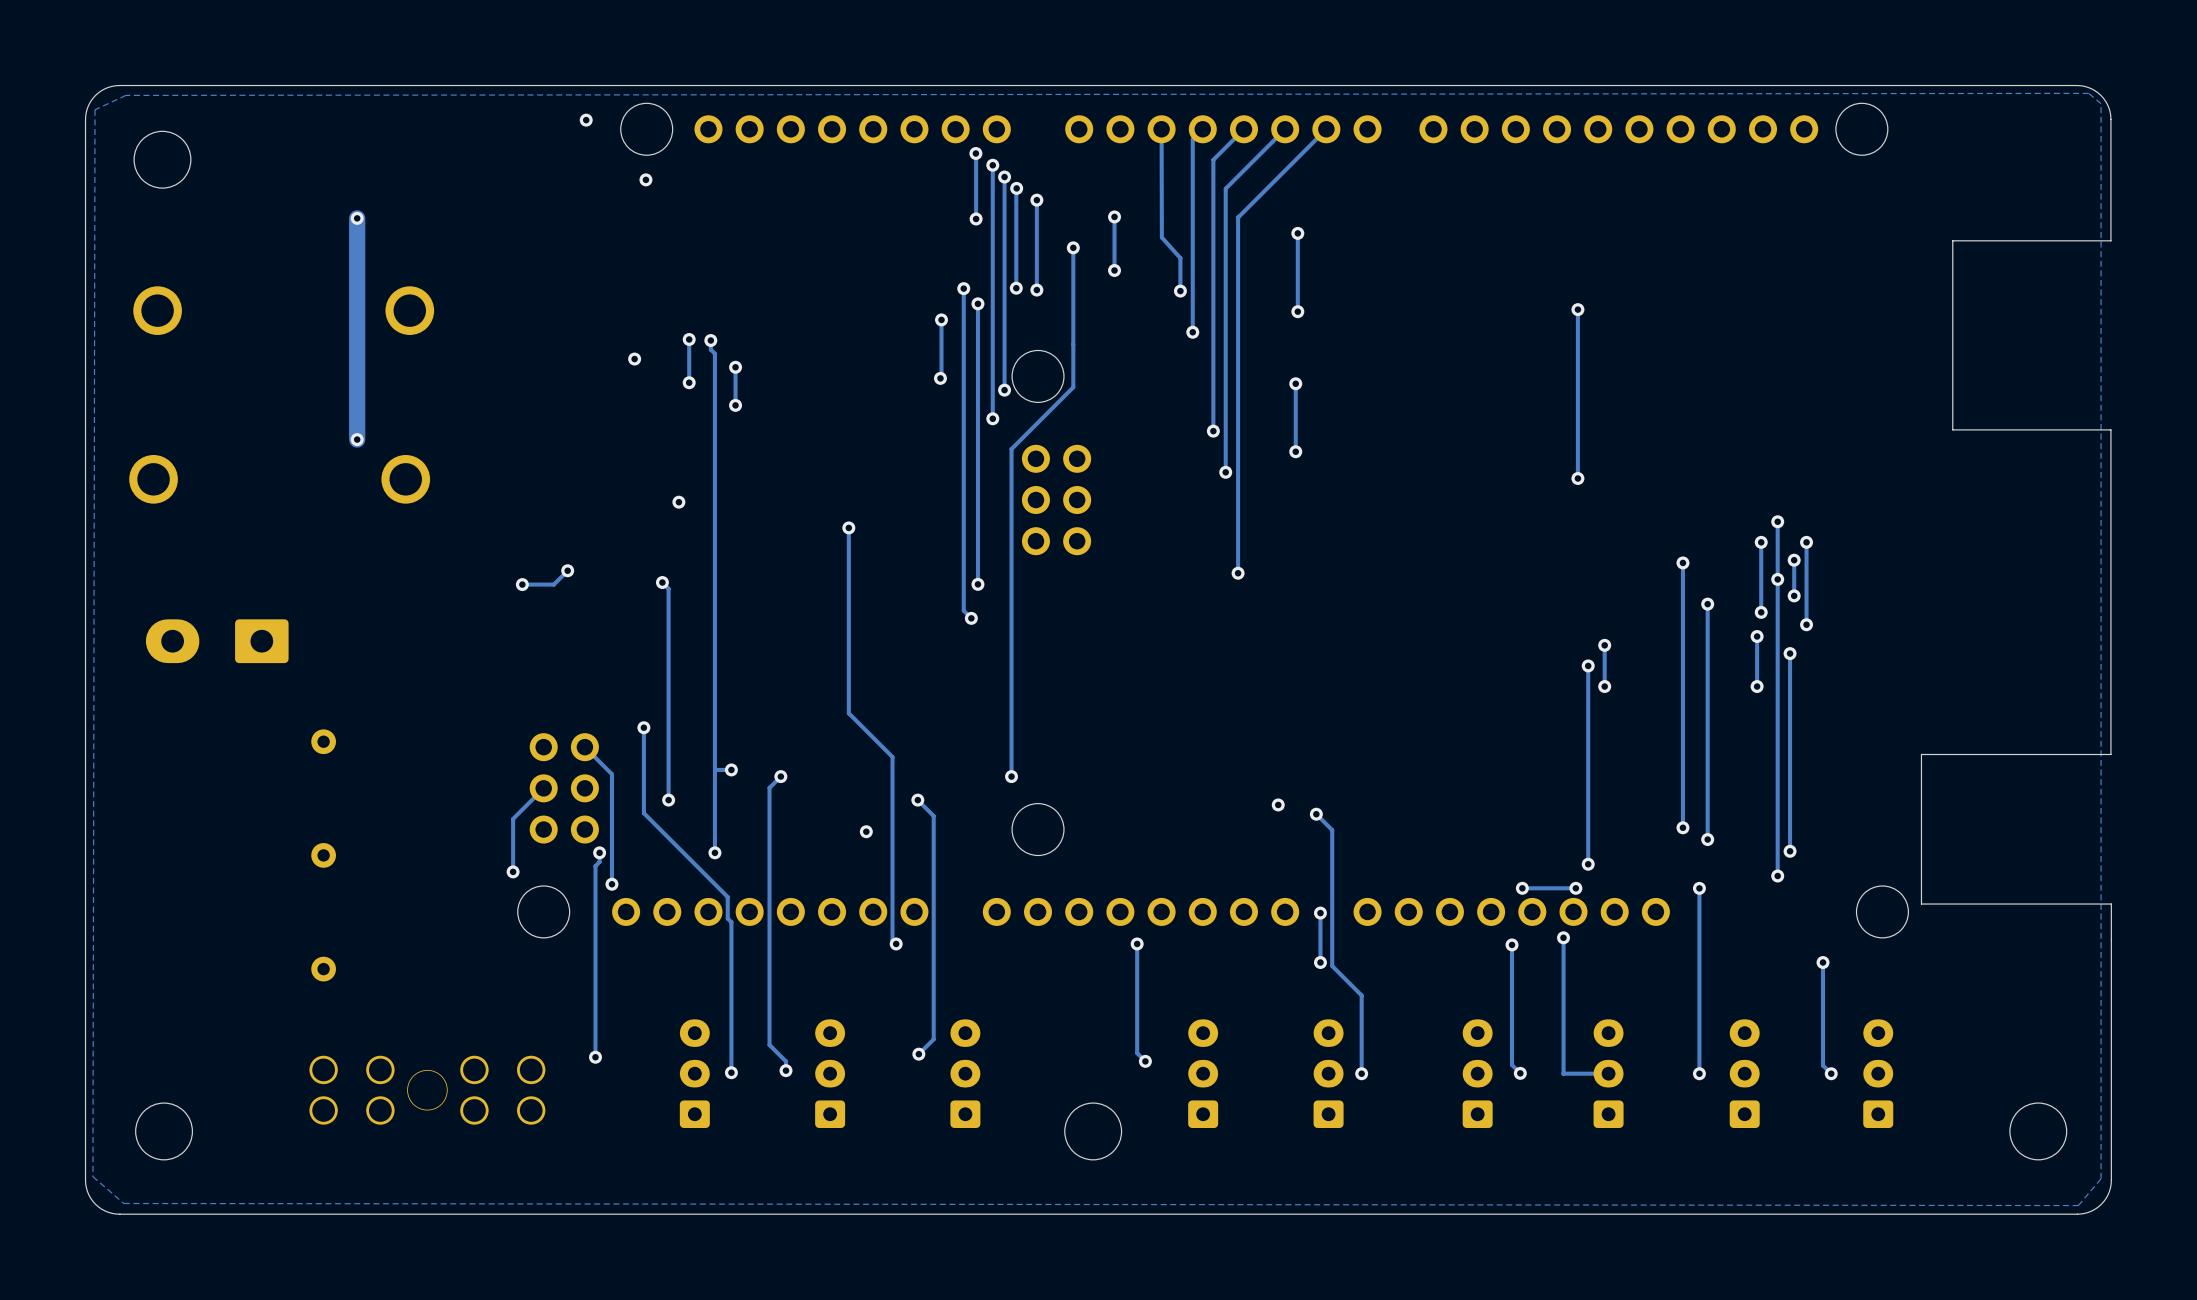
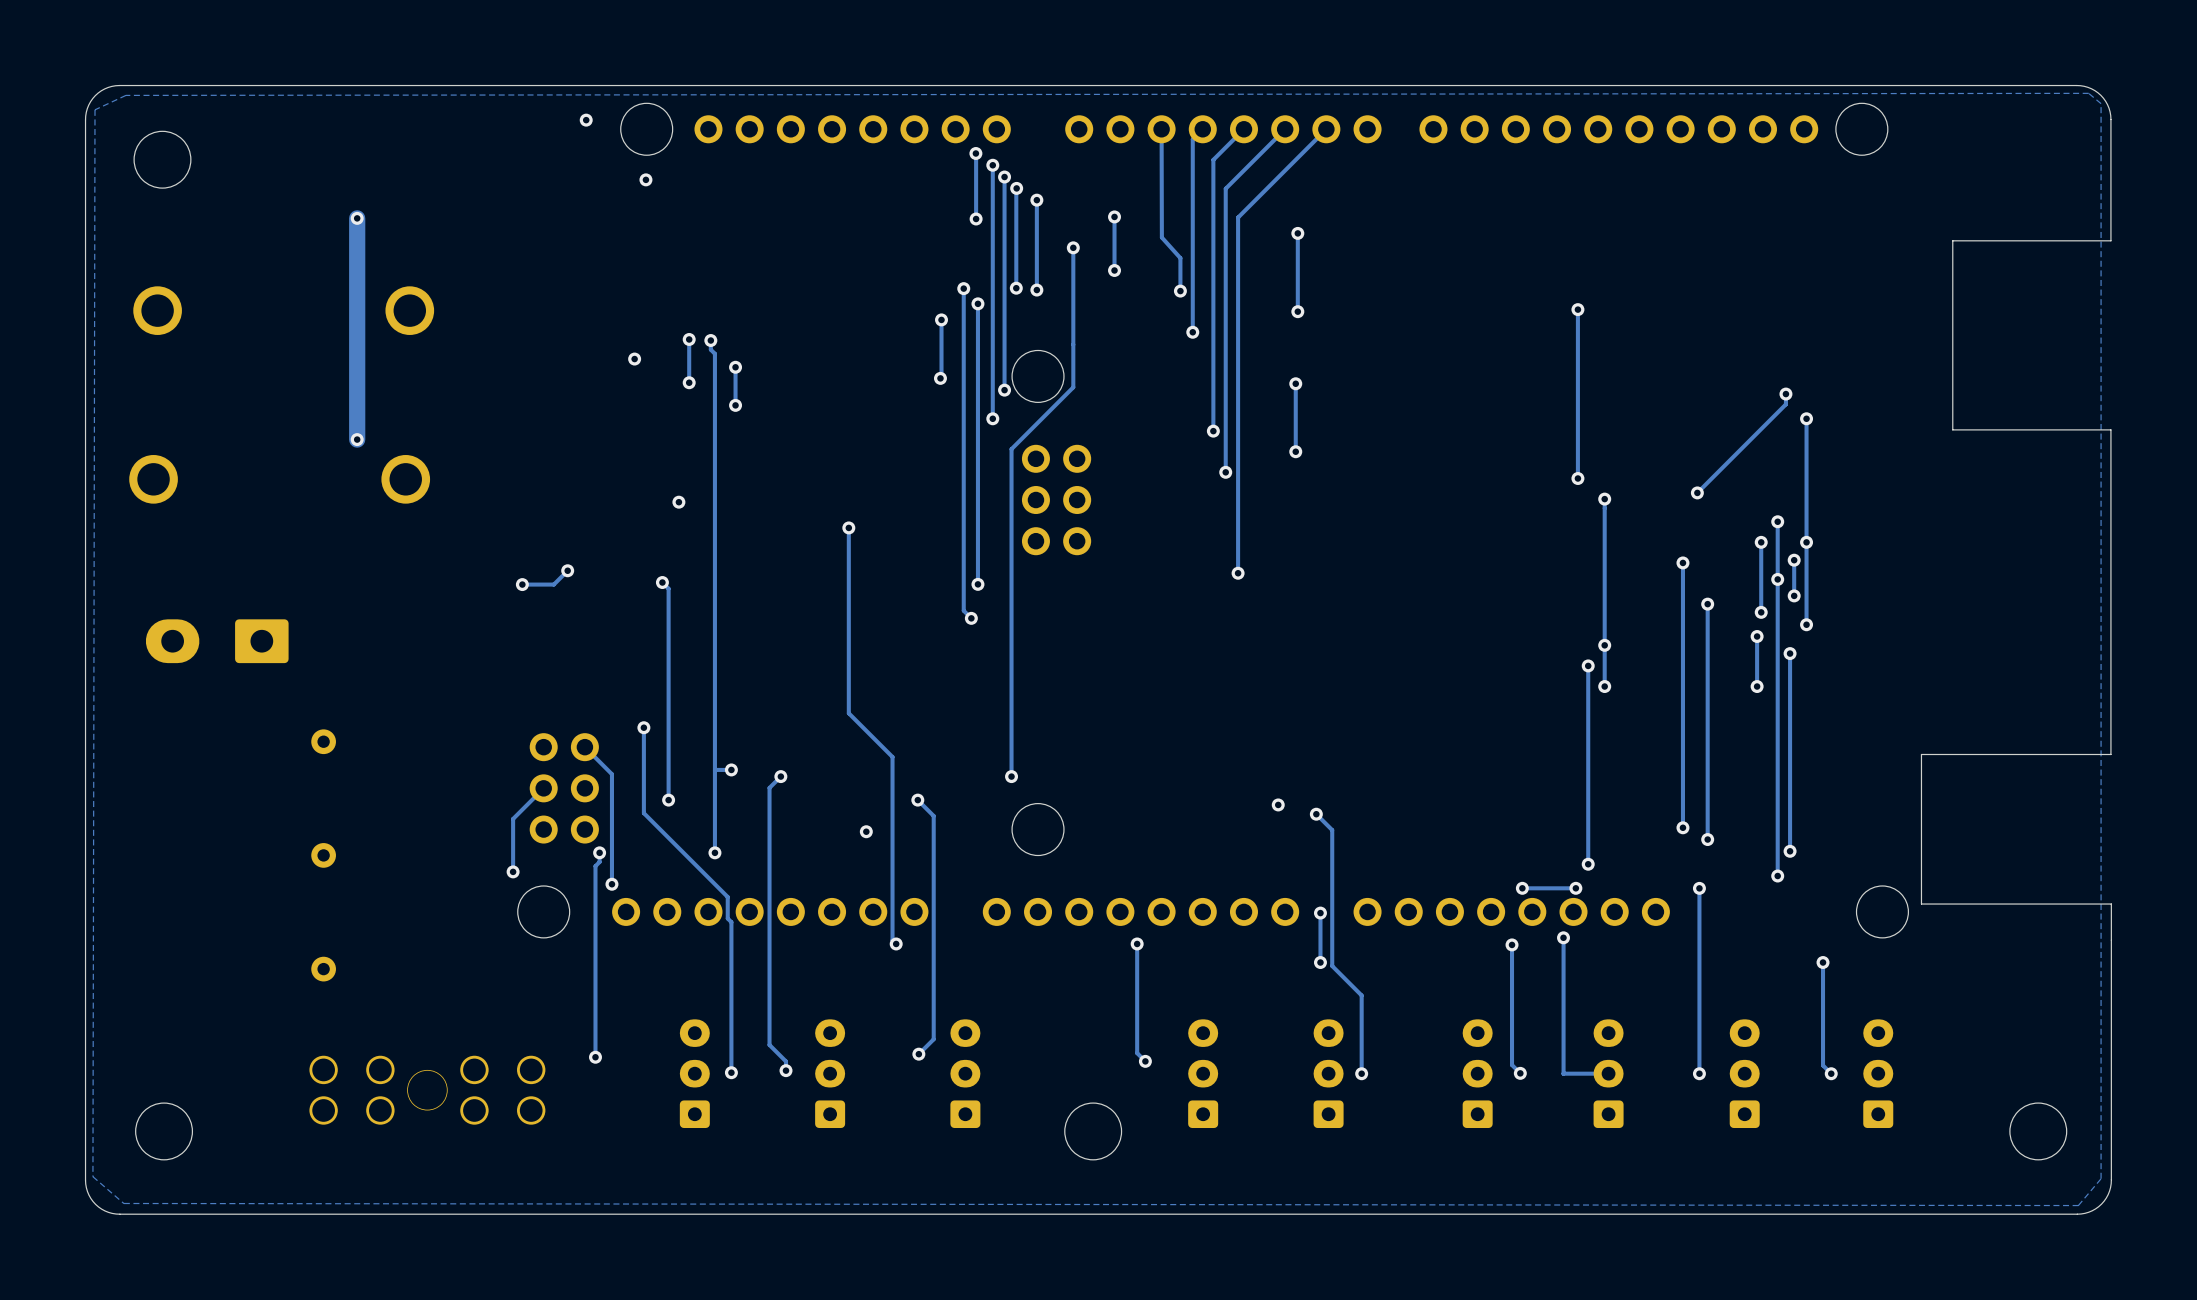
track: none -> (1785, 394) (1785, 404) (1697, 492)
via: none -> (1785, 394)
track: none -> (1806, 418) (1806, 542)
via: none -> (1806, 418)
via: none -> (1697, 492)
track: none -> (1604, 499) (1604, 645)
via: none -> (1604, 499)

